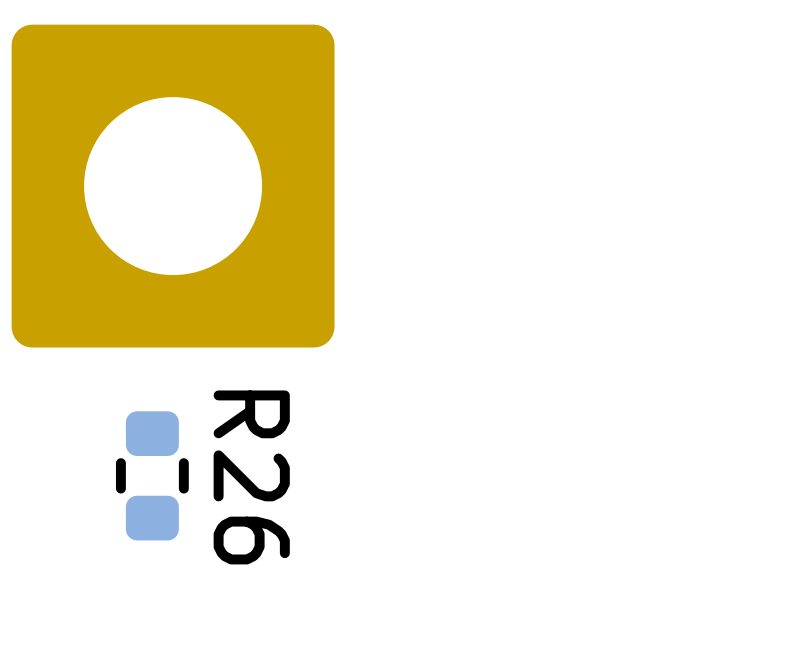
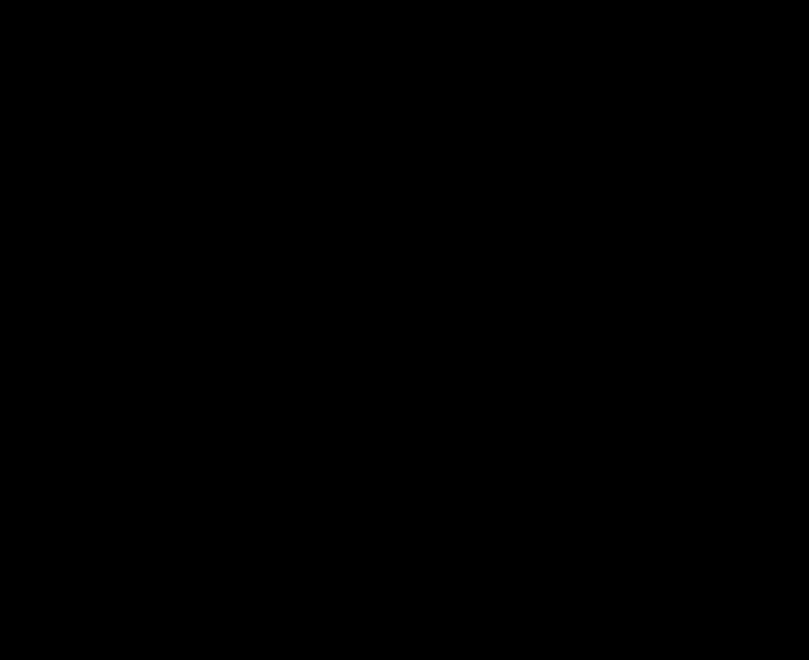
part: (173, 186) -> none
R26: (152, 475) -> none

